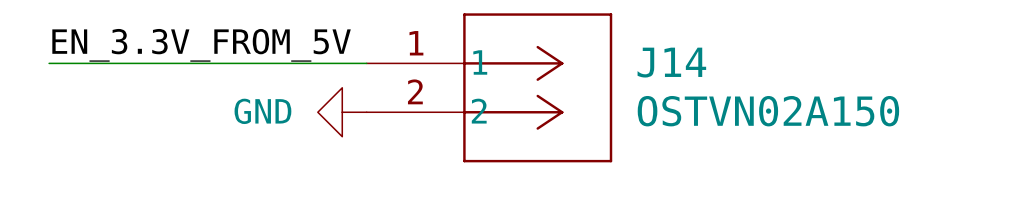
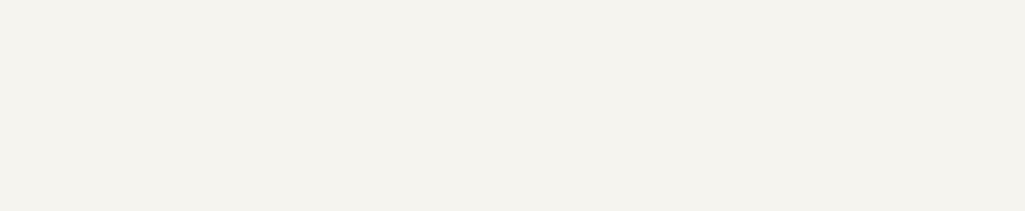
label: EN_3.3V_FROM_5V (201, 45) -> none
wire: (49, 63) (366, 63) -> none
J14: OSTVN02A150 (489, 87) -> none
power symbol: GND (342, 112) -> none

